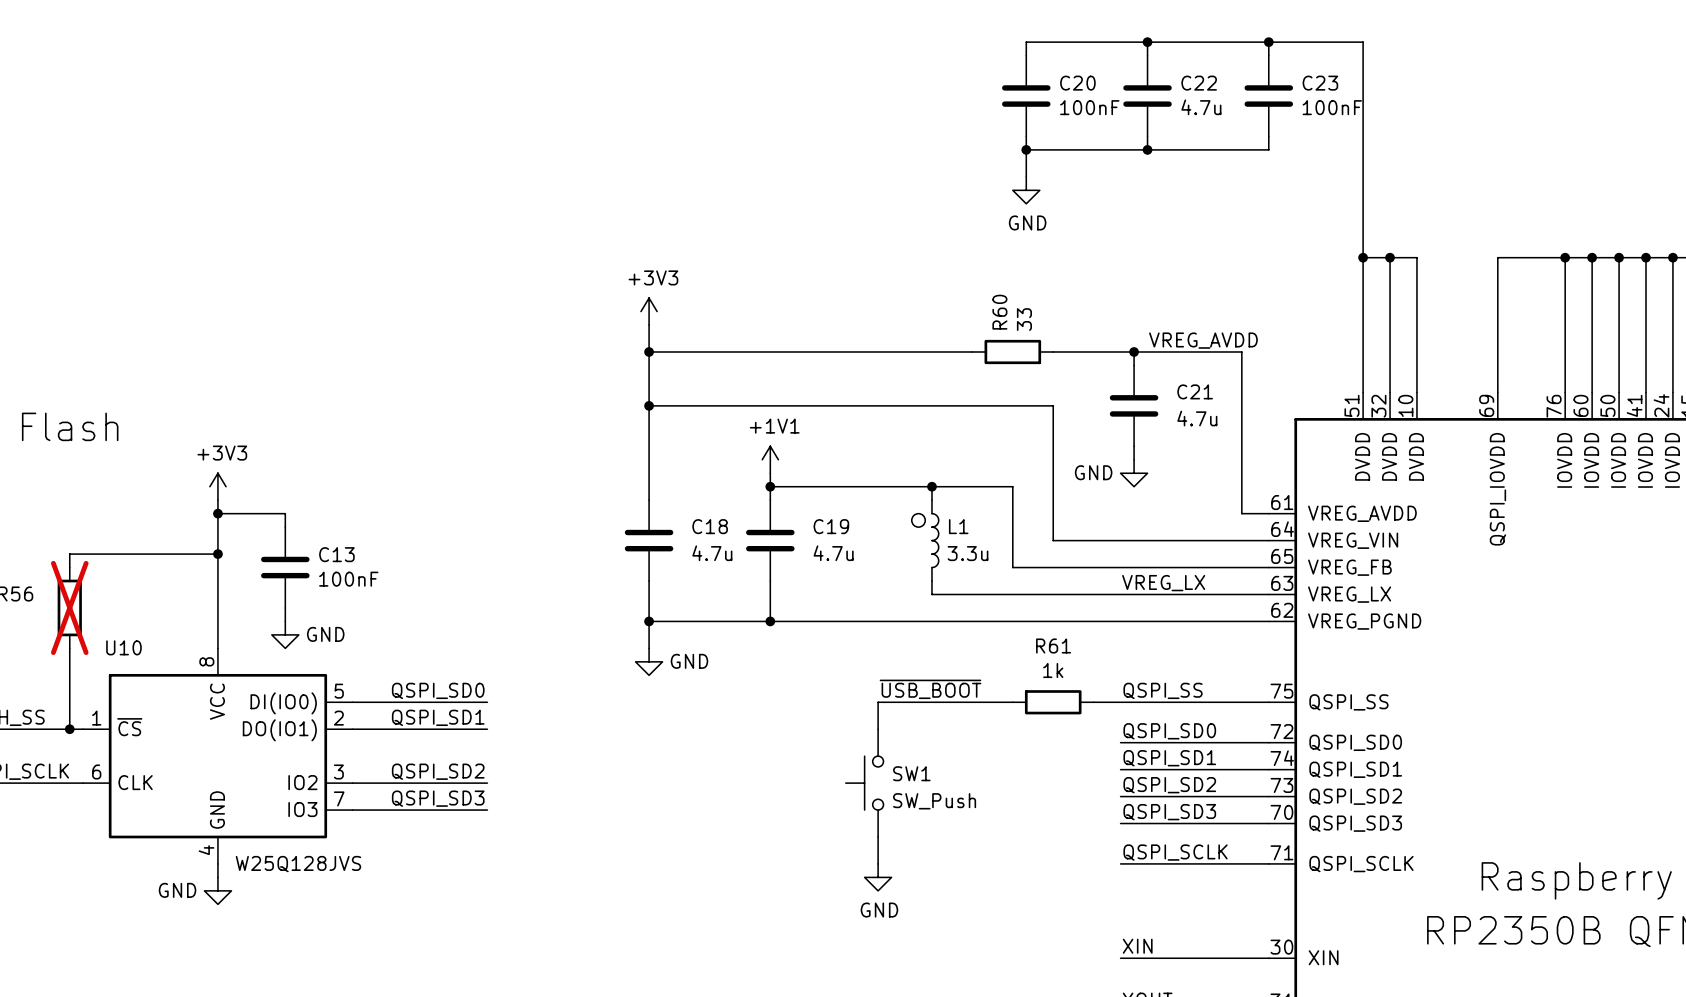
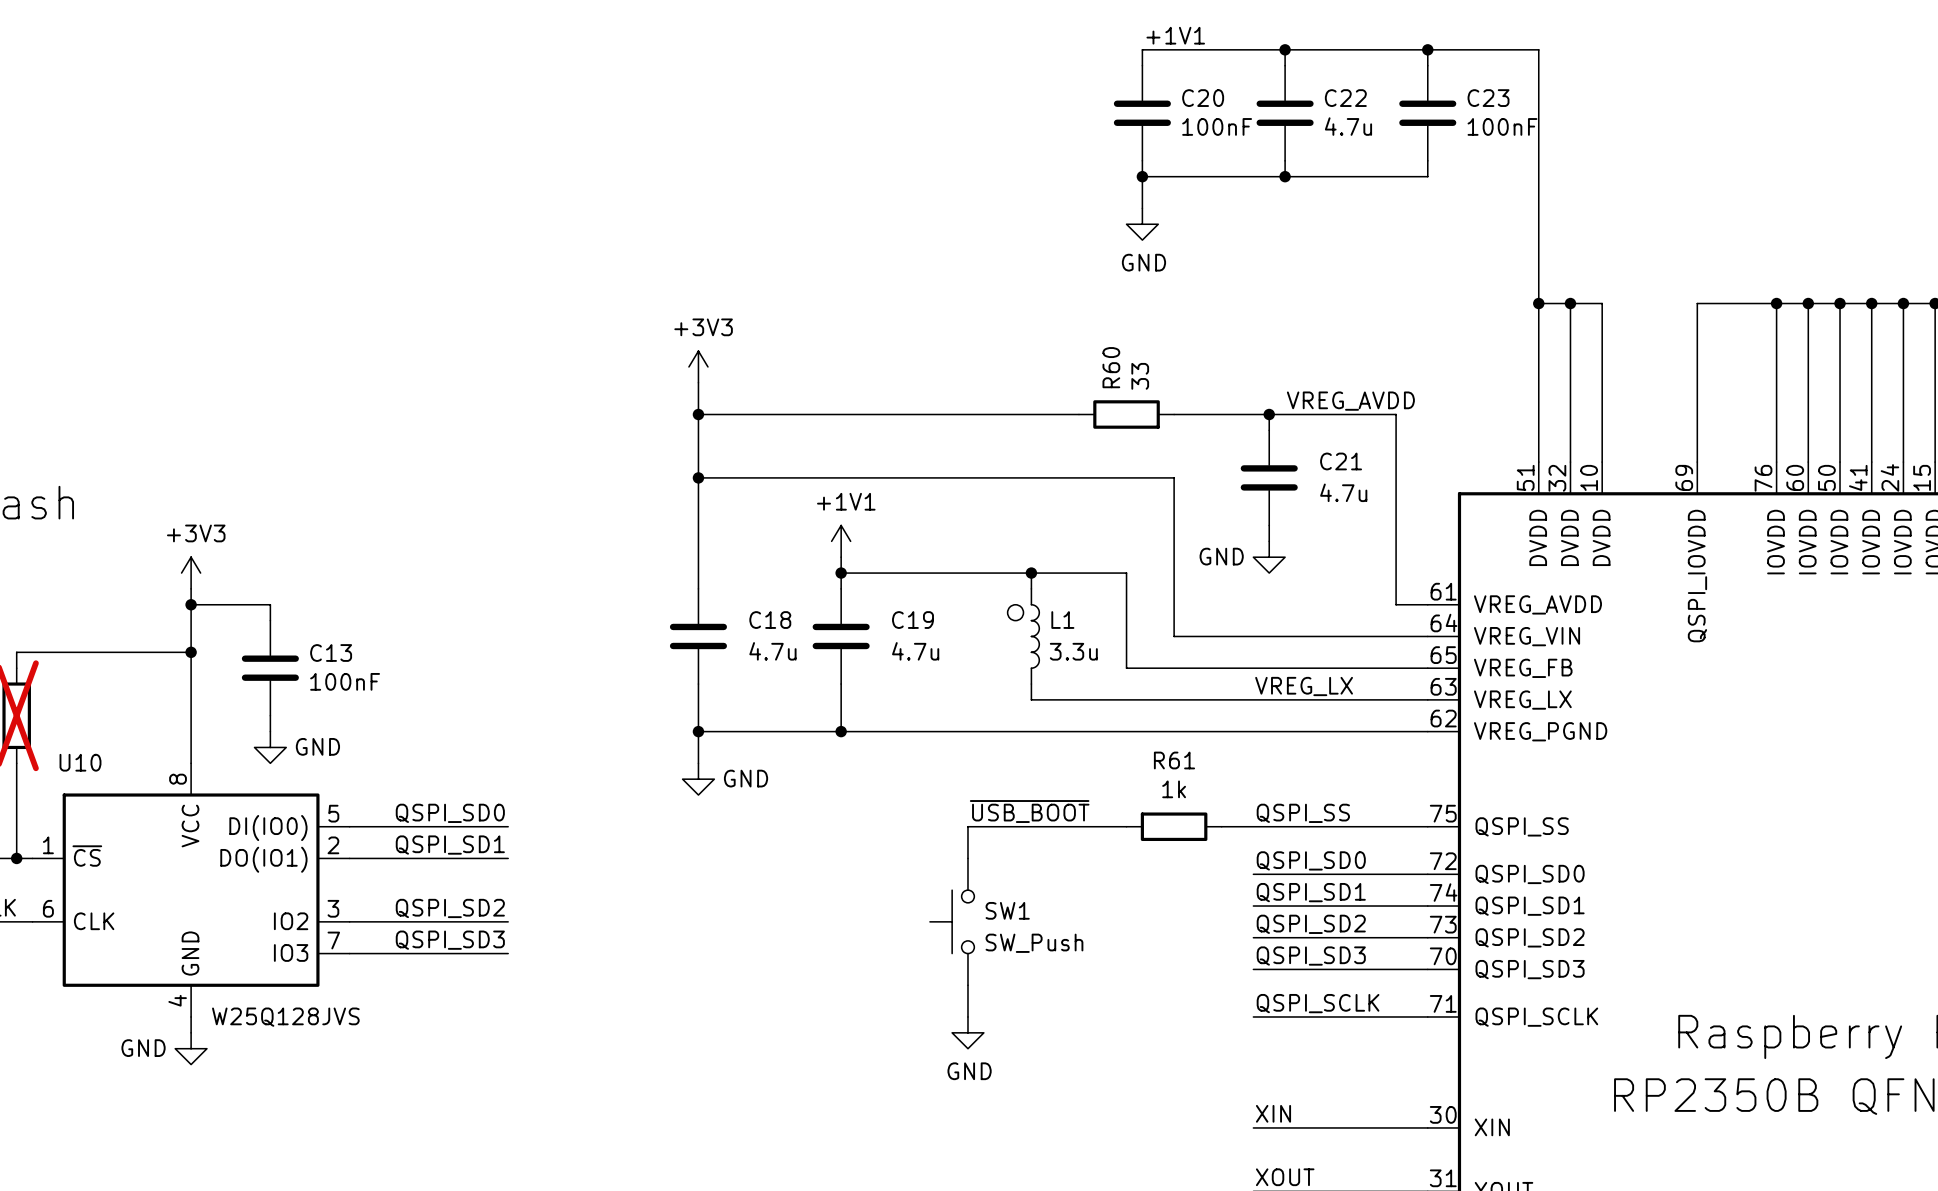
label: none -> +1V1 (1175, 35)

